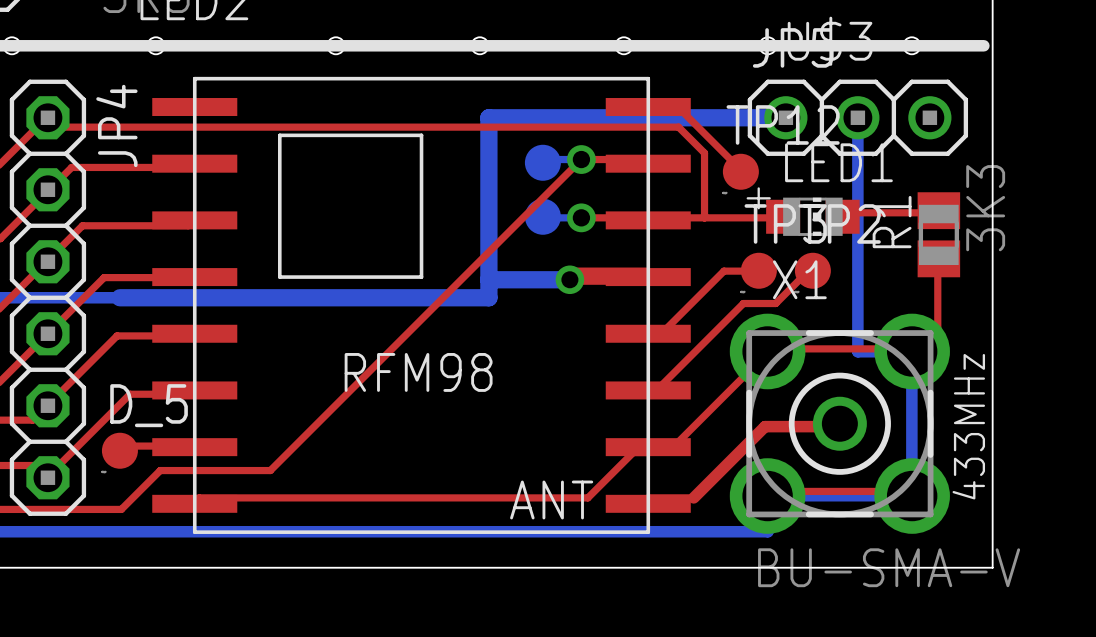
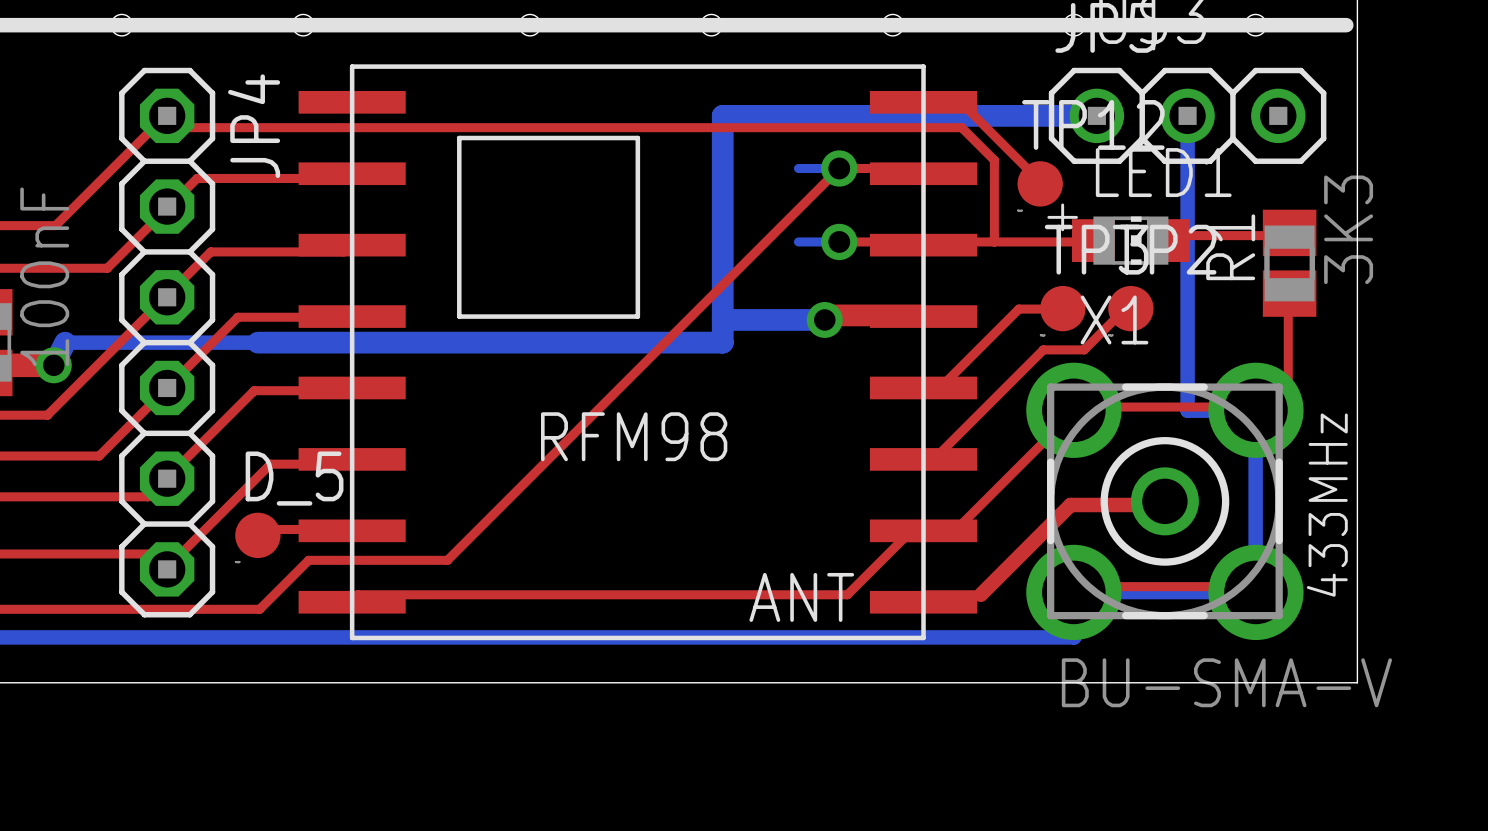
part: (542, 162) -> none
part: (542, 216) -> none

